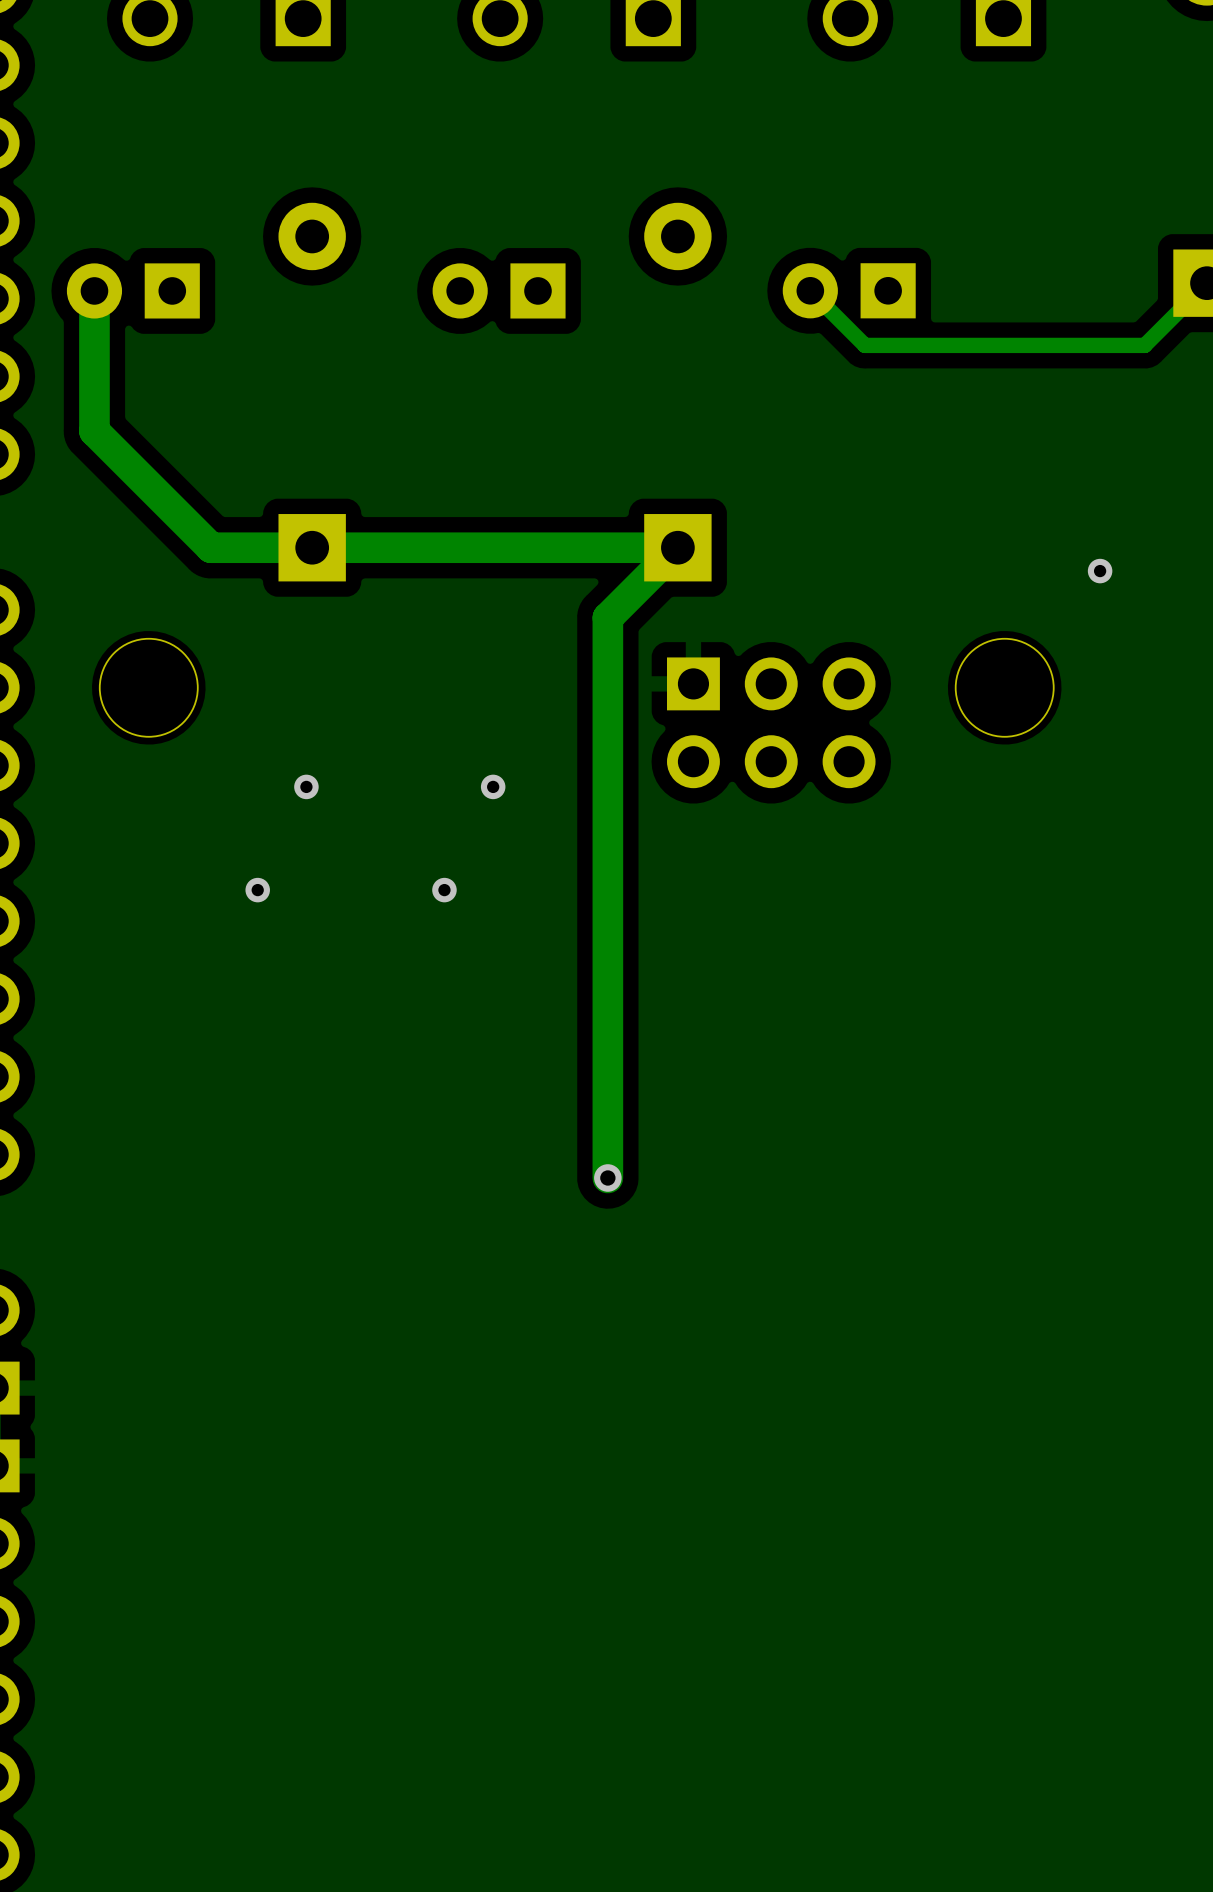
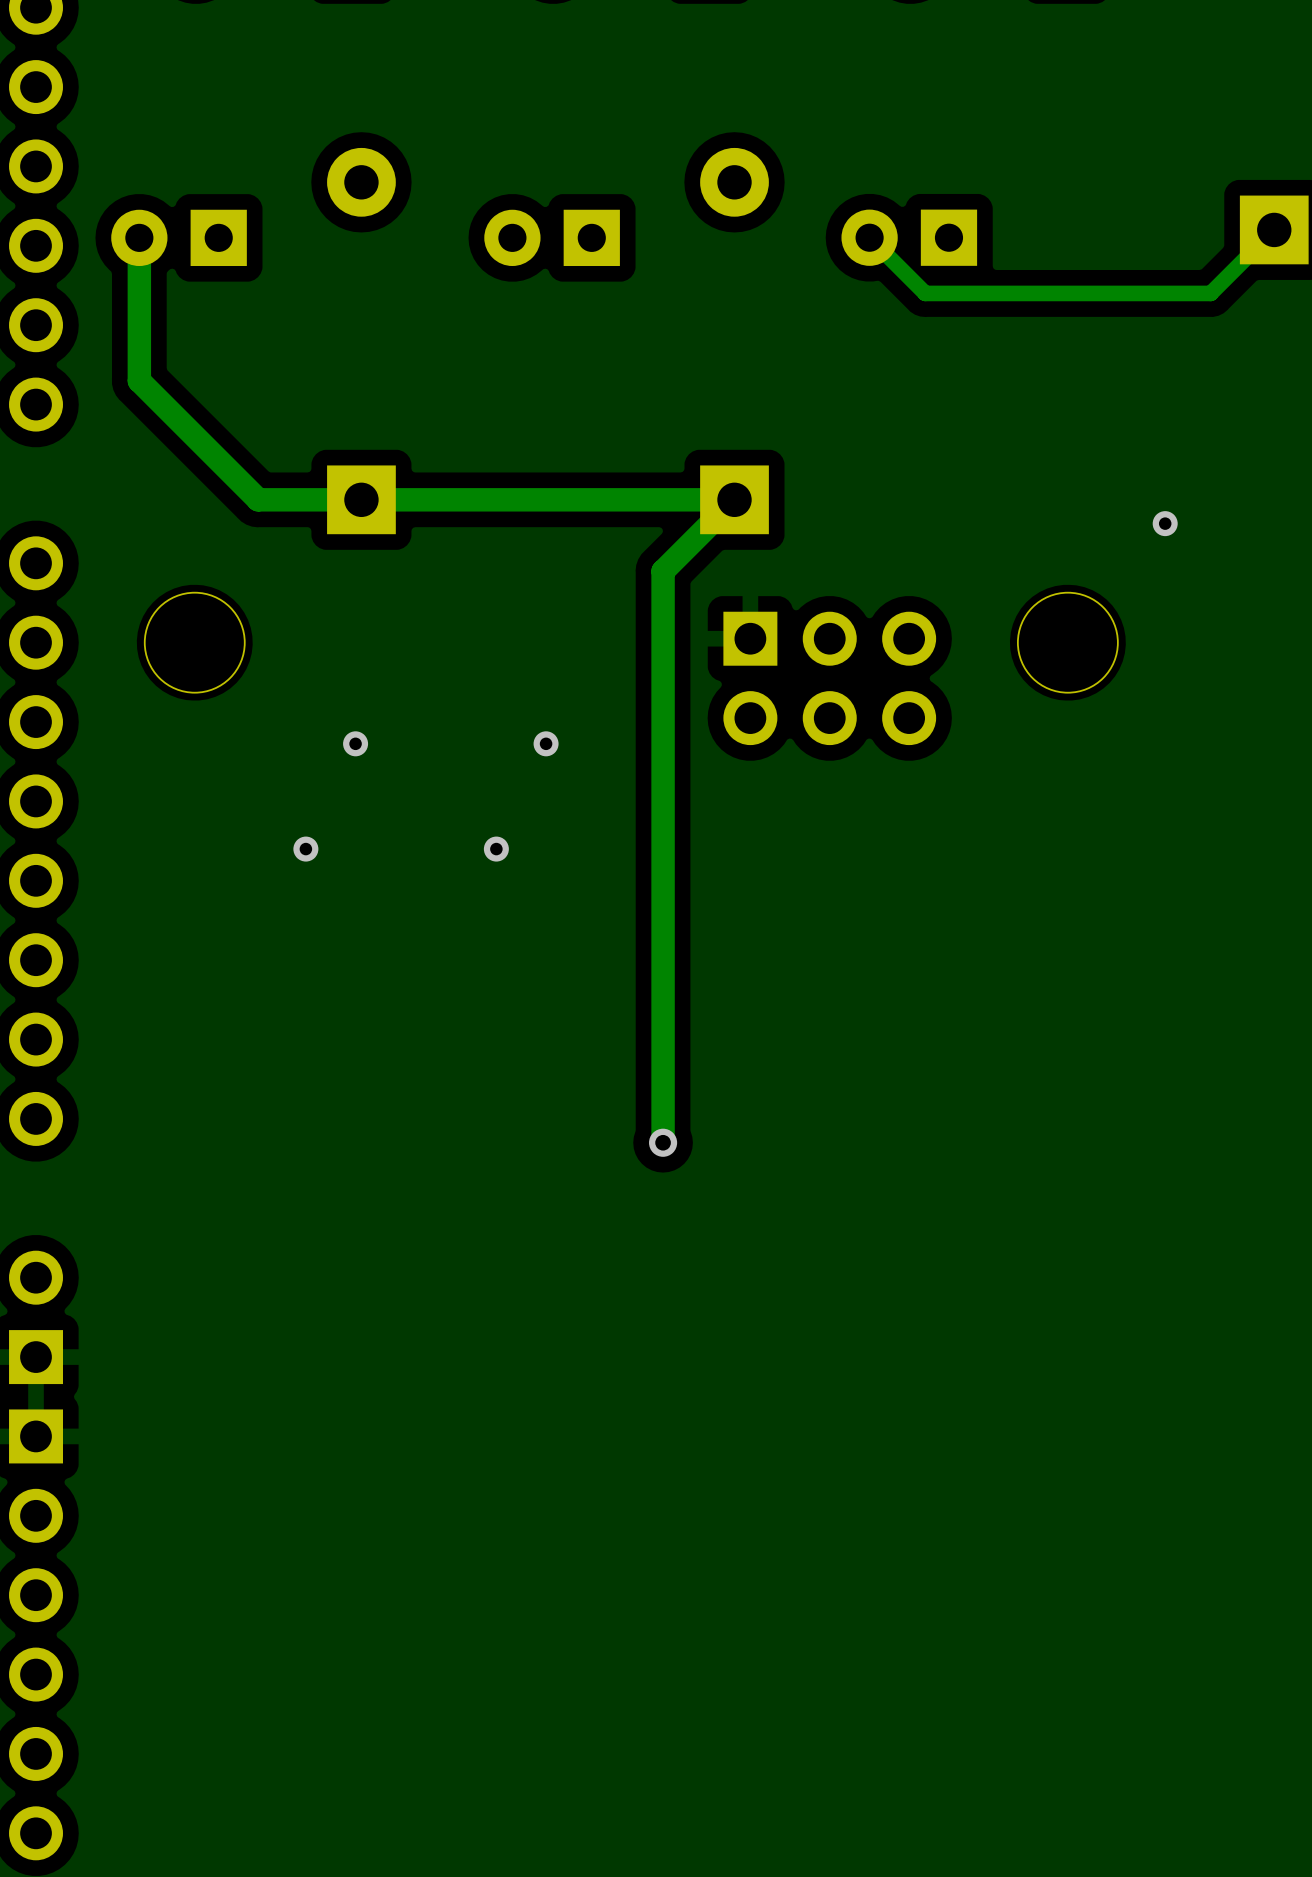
track width: thick (94, 290) (94, 431) (211, 547) (677, 547) (607, 617) (607, 1177) -> thin (139, 237) (139, 380) (258, 499) (734, 499) (663, 571) (663, 1142)

